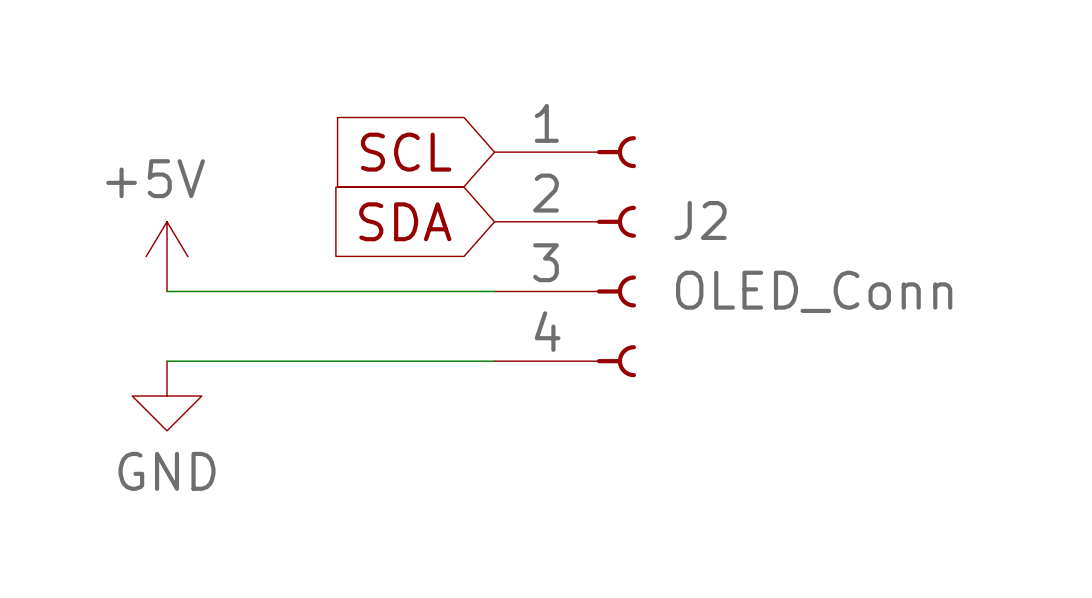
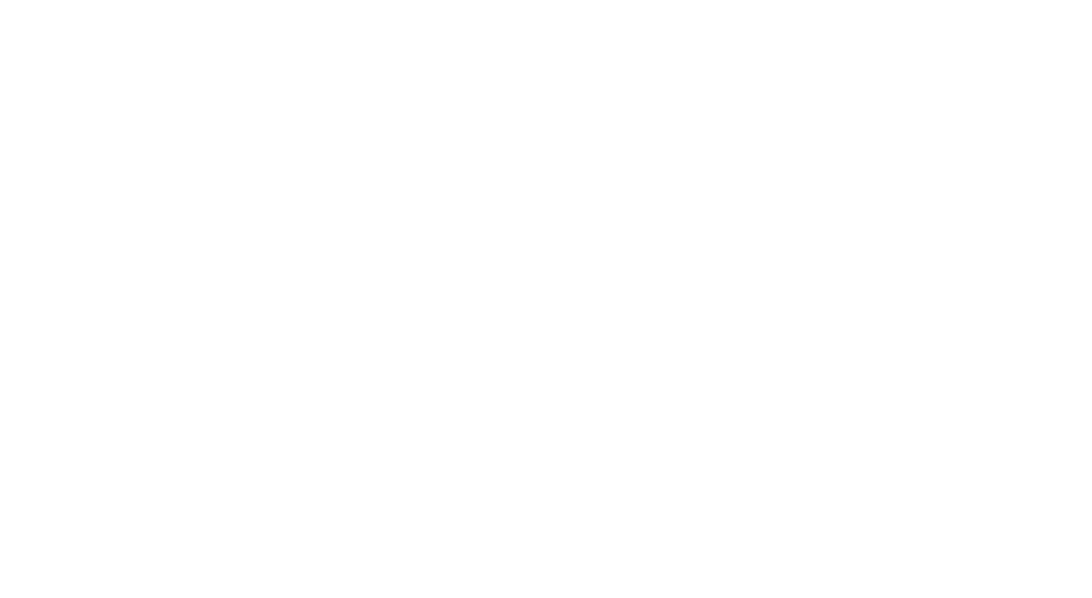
global label: SCL (406, 152) -> none
global label: SDA (405, 221) -> none
power symbol: +5V (167, 256) -> none
J2: OLED_Conn (565, 256) -> none
wire: (167, 291) (494, 291) -> none
wire: (167, 361) (494, 361) -> none
power symbol: GND (167, 396) -> none

